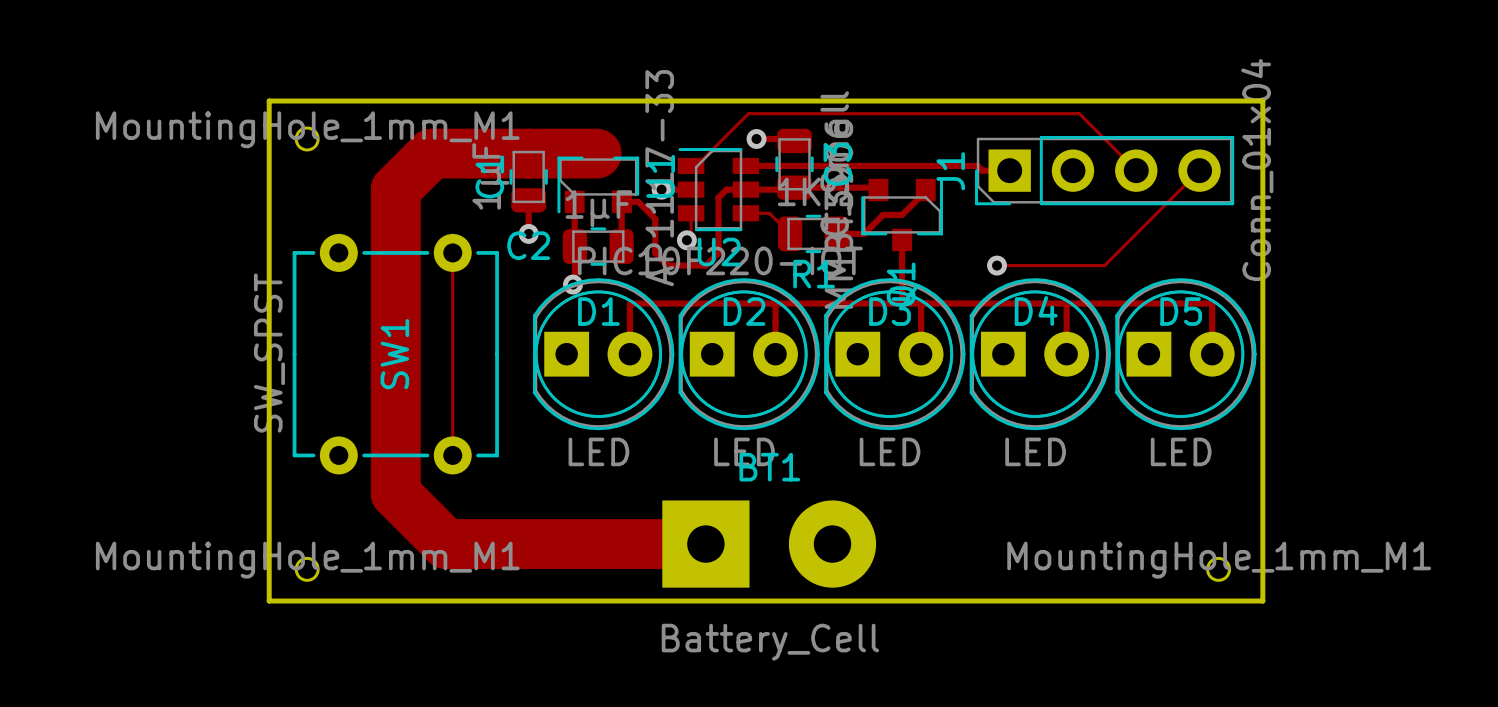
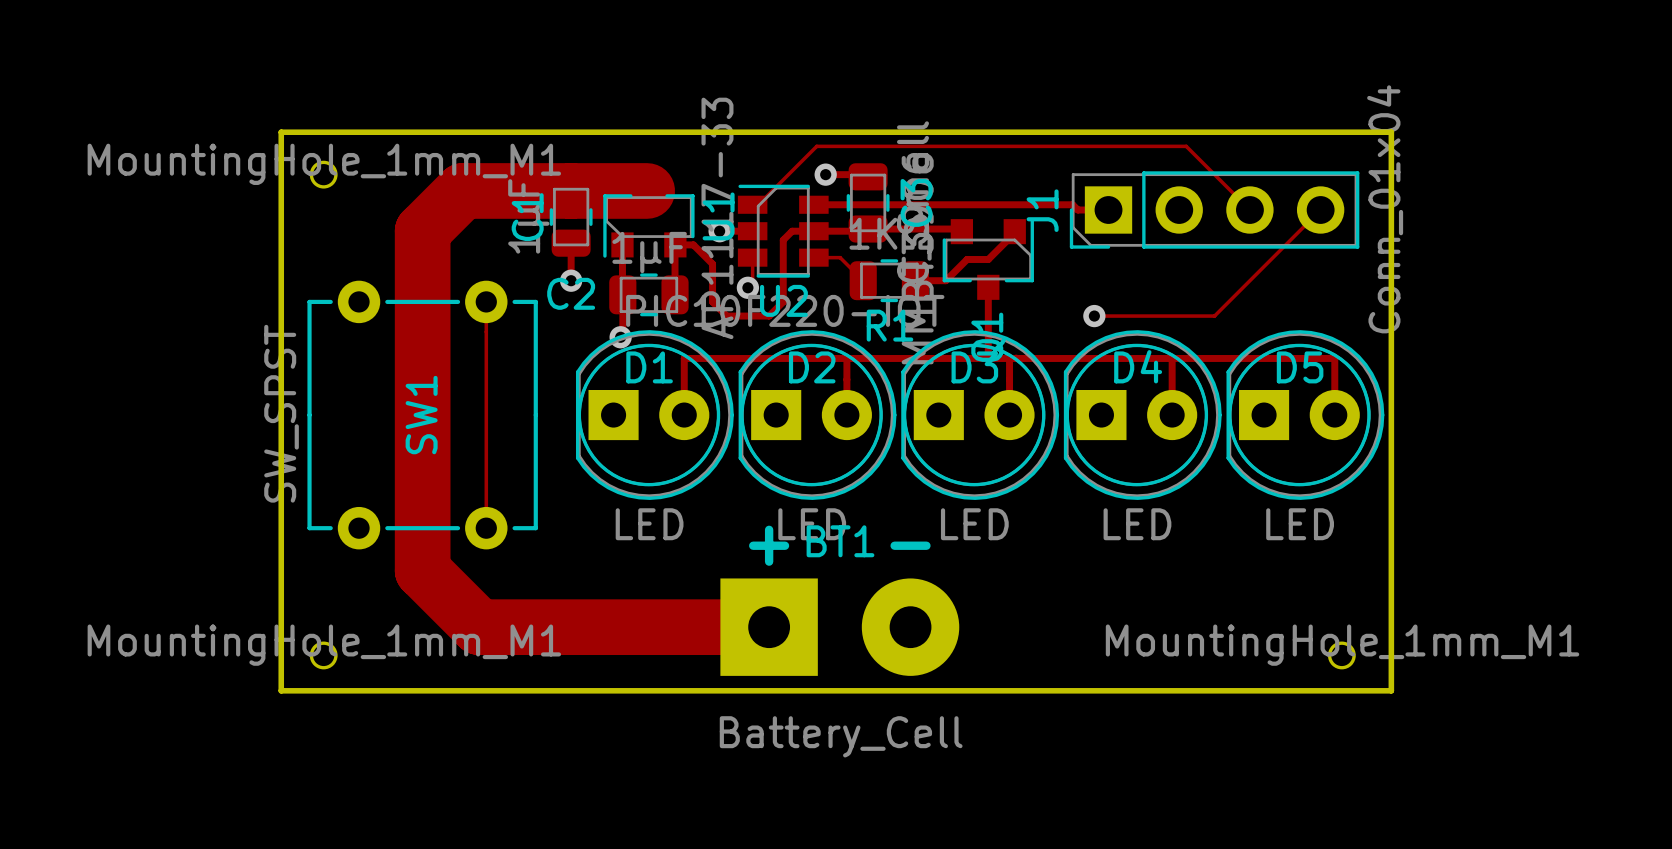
text: none -> + (769, 545)
text: none -> - (910, 545)

